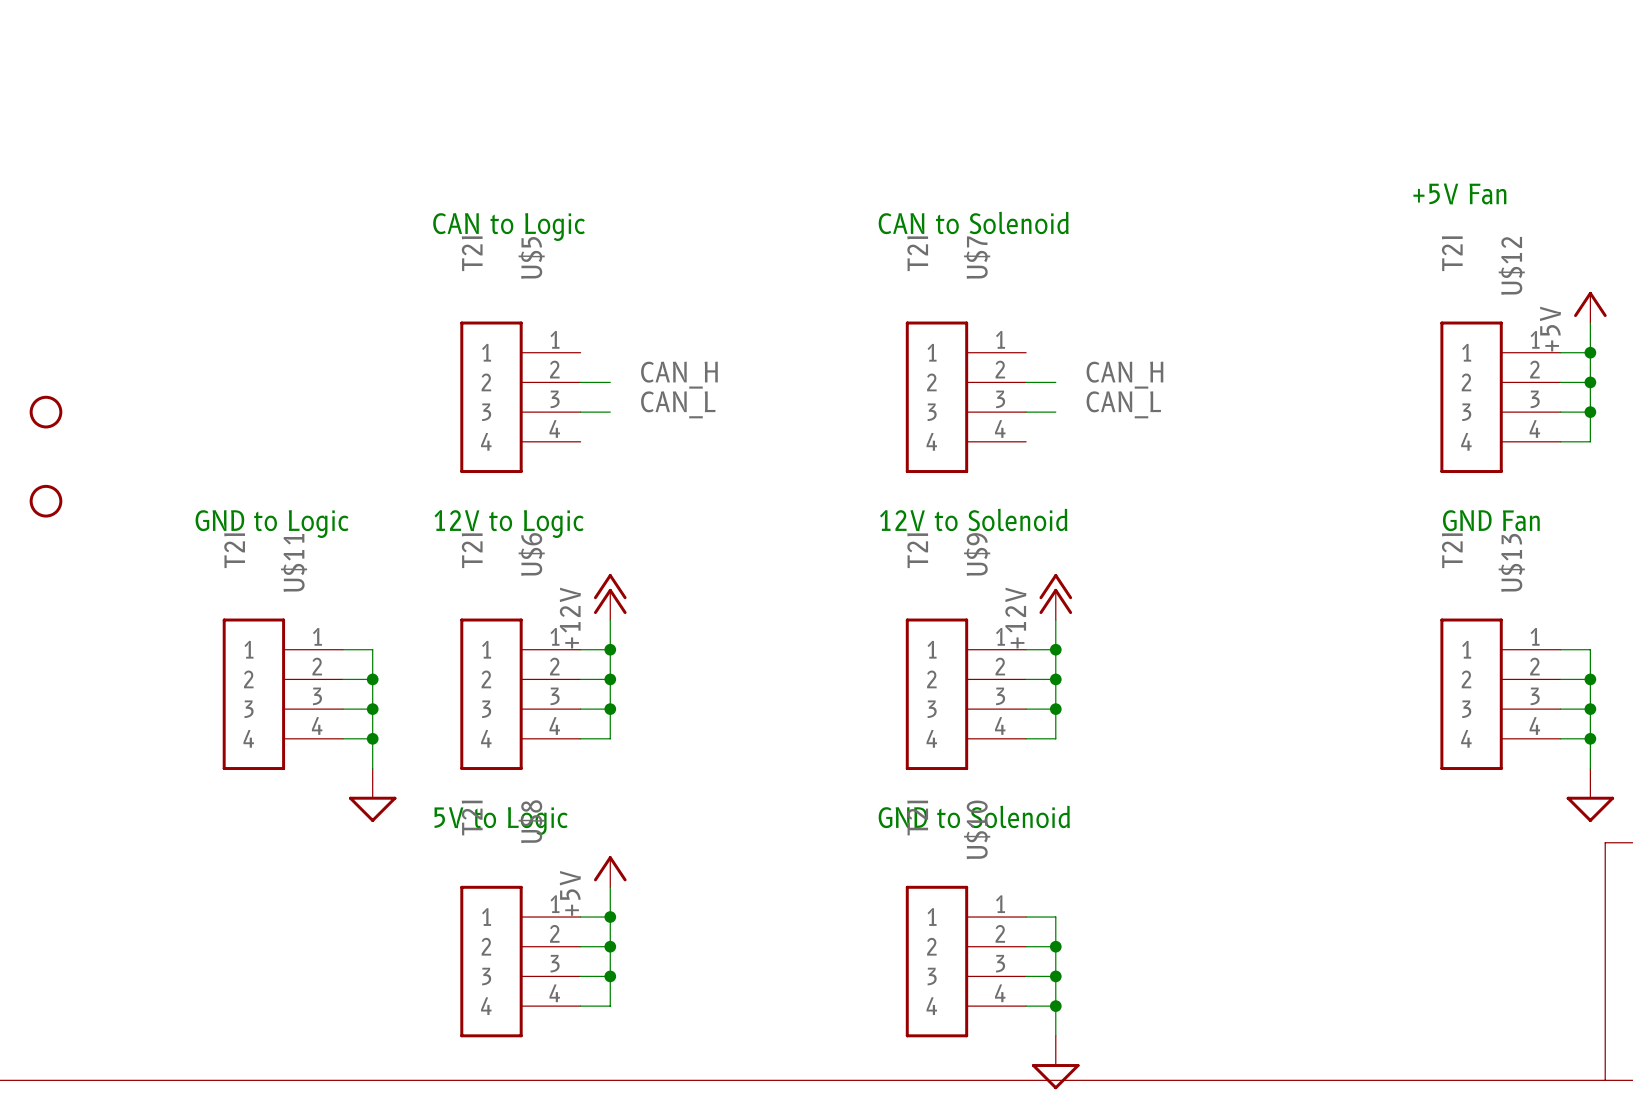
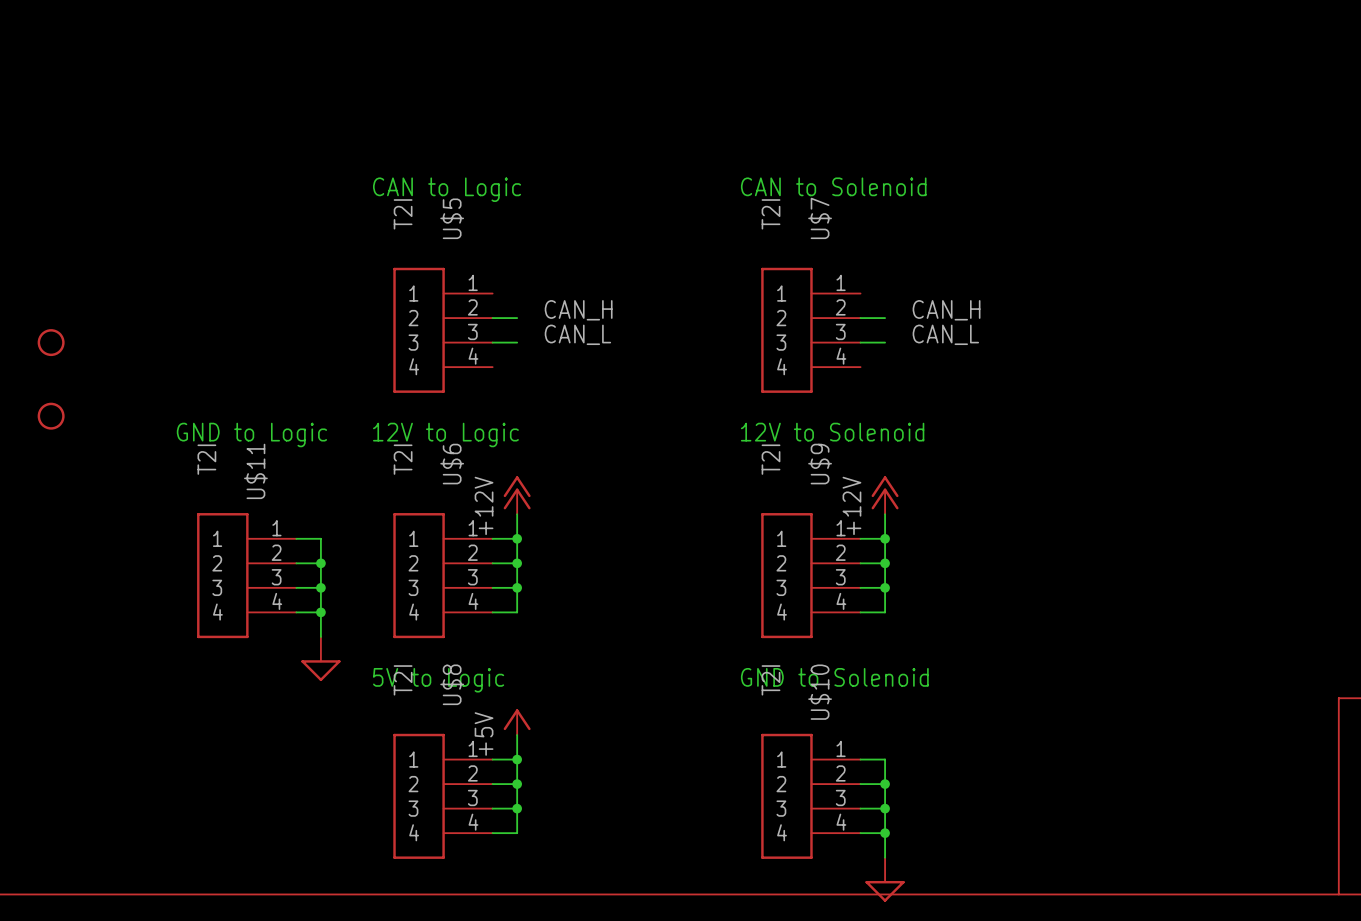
text: +5V Fan (1459, 193) -> none
power symbol: +5V (1590, 307) -> none
wire: (1590, 323) (1590, 441) (1560, 441) -> none
wire: (1560, 352) (1590, 352) -> none
junction: (1590, 352) -> none
wire: (1560, 382) (1590, 382) -> none
junction: (1590, 382) -> none
U$12: T2I (1500, 397) -> none
wire: (1560, 412) (1590, 412) -> none
junction: (1590, 412) -> none
text: GND Fan (1491, 520) -> none
wire: (1560, 649) (1590, 649) (1590, 768) -> none
wire: (1560, 679) (1590, 679) -> none
junction: (1590, 679) -> none
U$13: T2I (1500, 694) -> none
wire: (1560, 709) (1590, 709) -> none
junction: (1590, 709) -> none
wire: (1560, 738) (1590, 738) -> none
junction: (1590, 738) -> none
power symbol: (1590, 795) -> none

